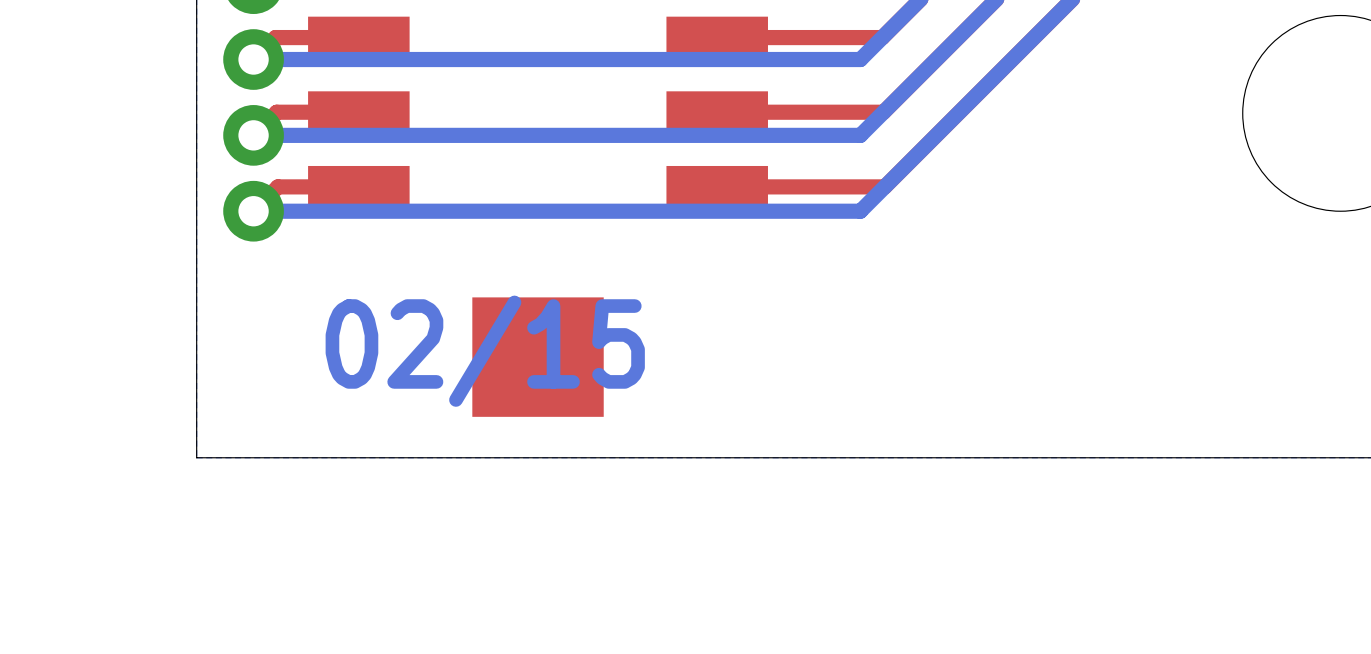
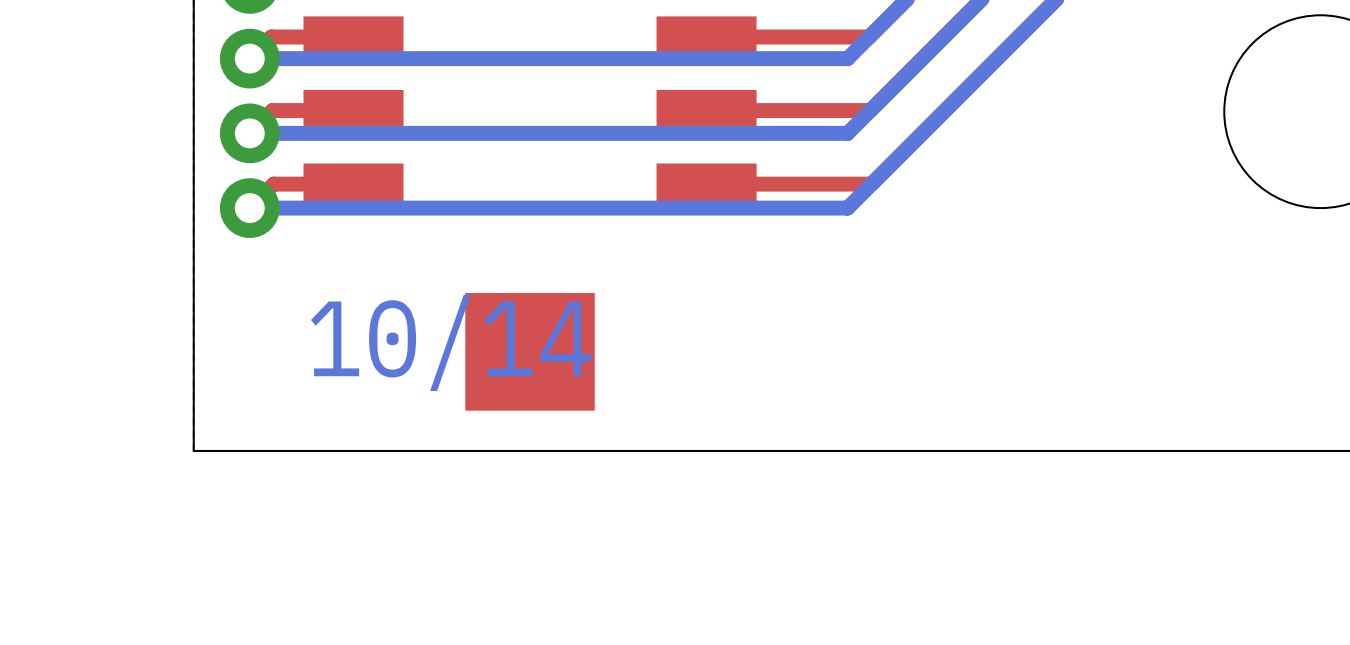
drawing shape: [325, 295, 645, 407] -> [310, 294, 592, 392]

